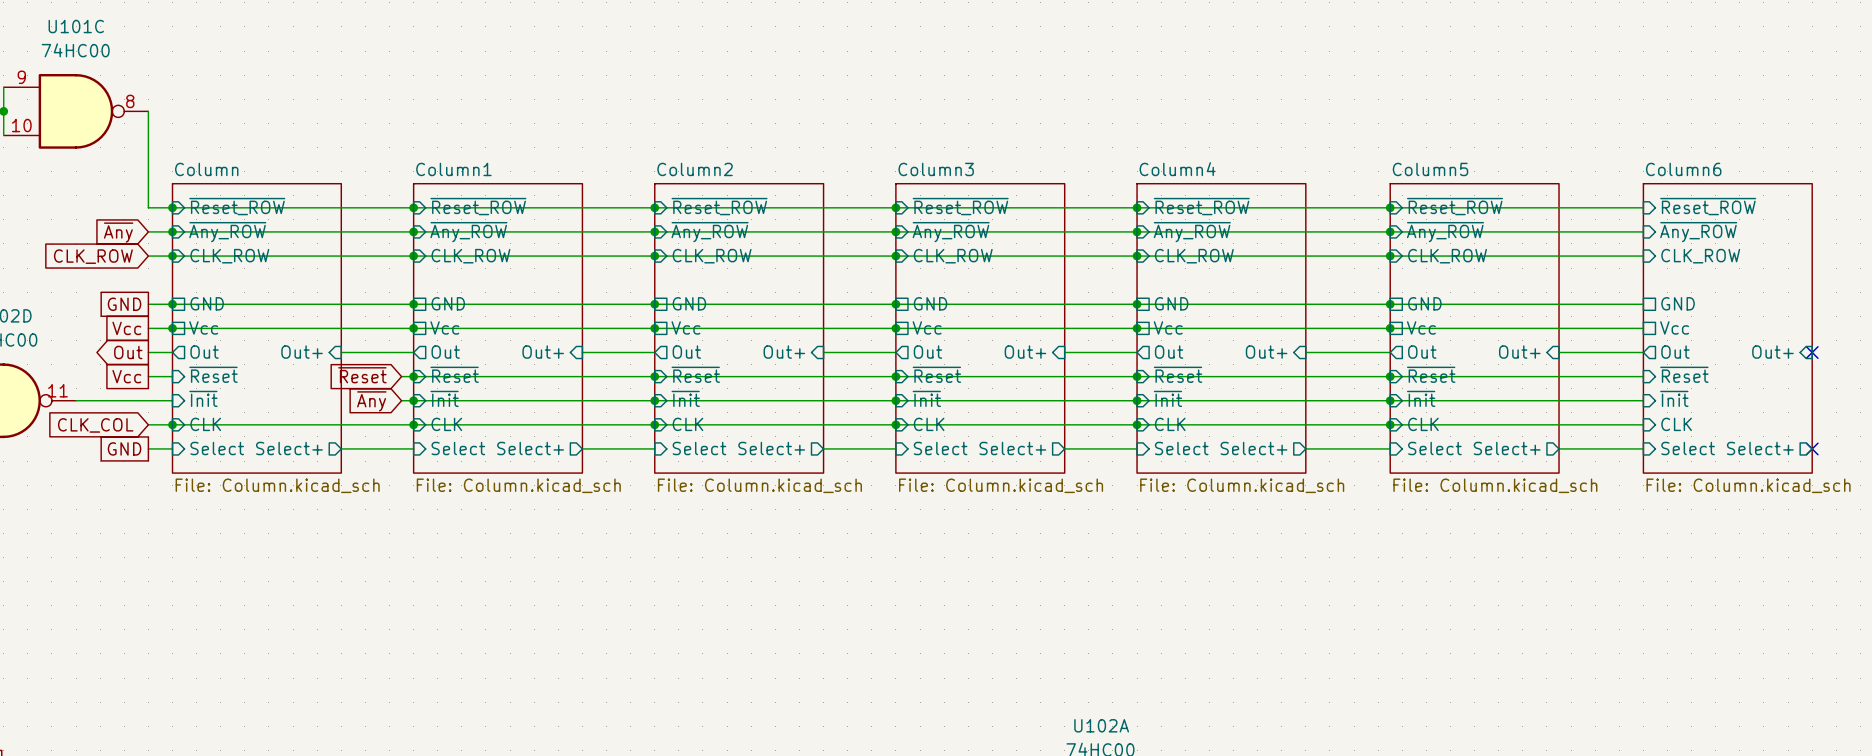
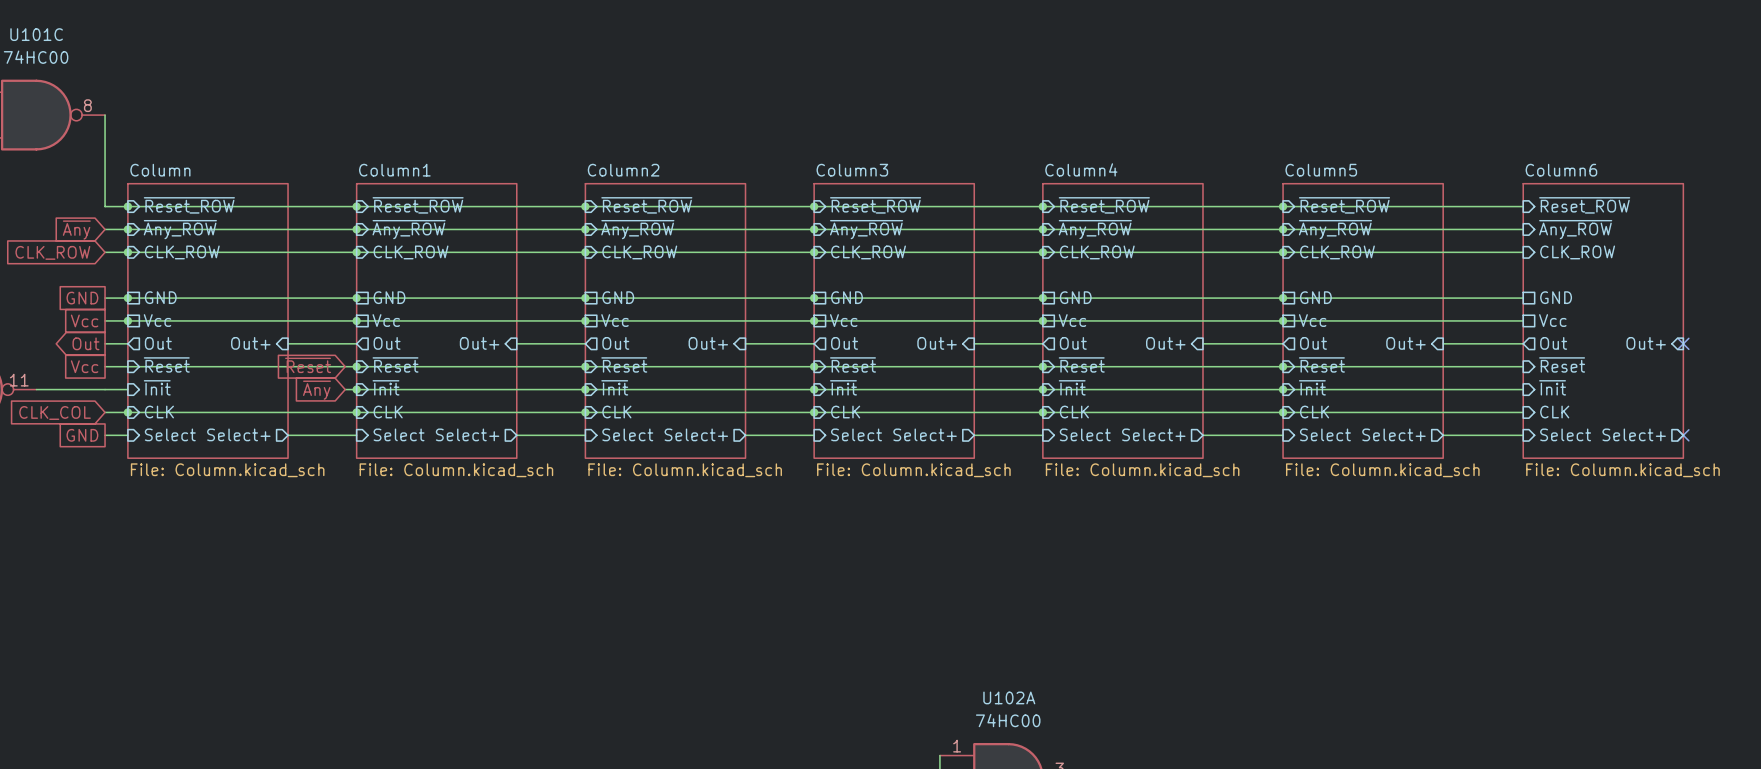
wire: none -> (127, 366) (345, 366)

